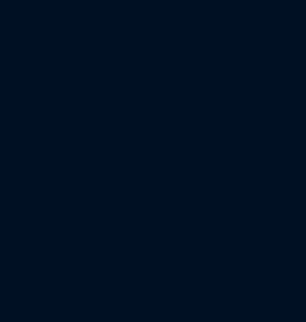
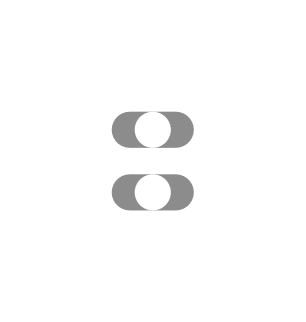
part: none -> (152, 161)

